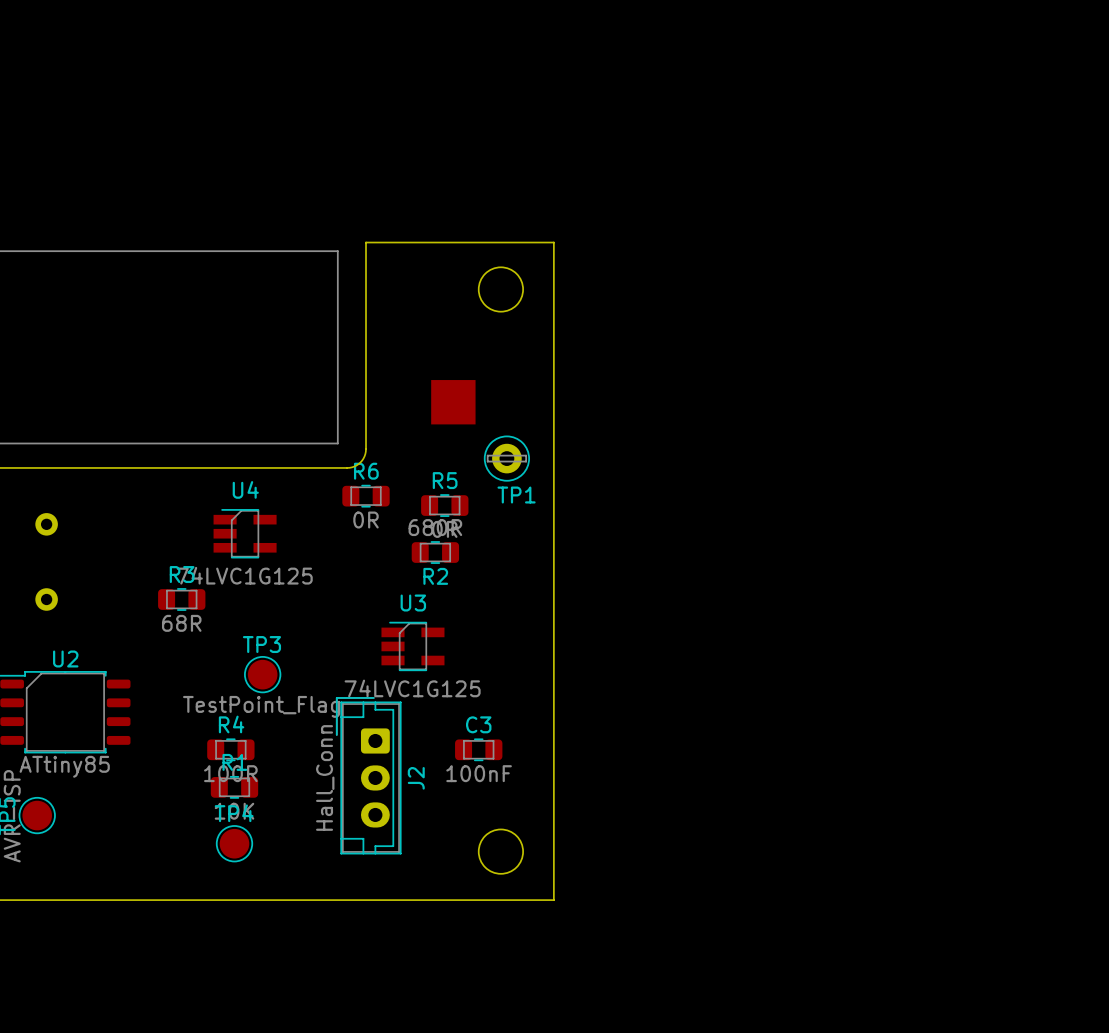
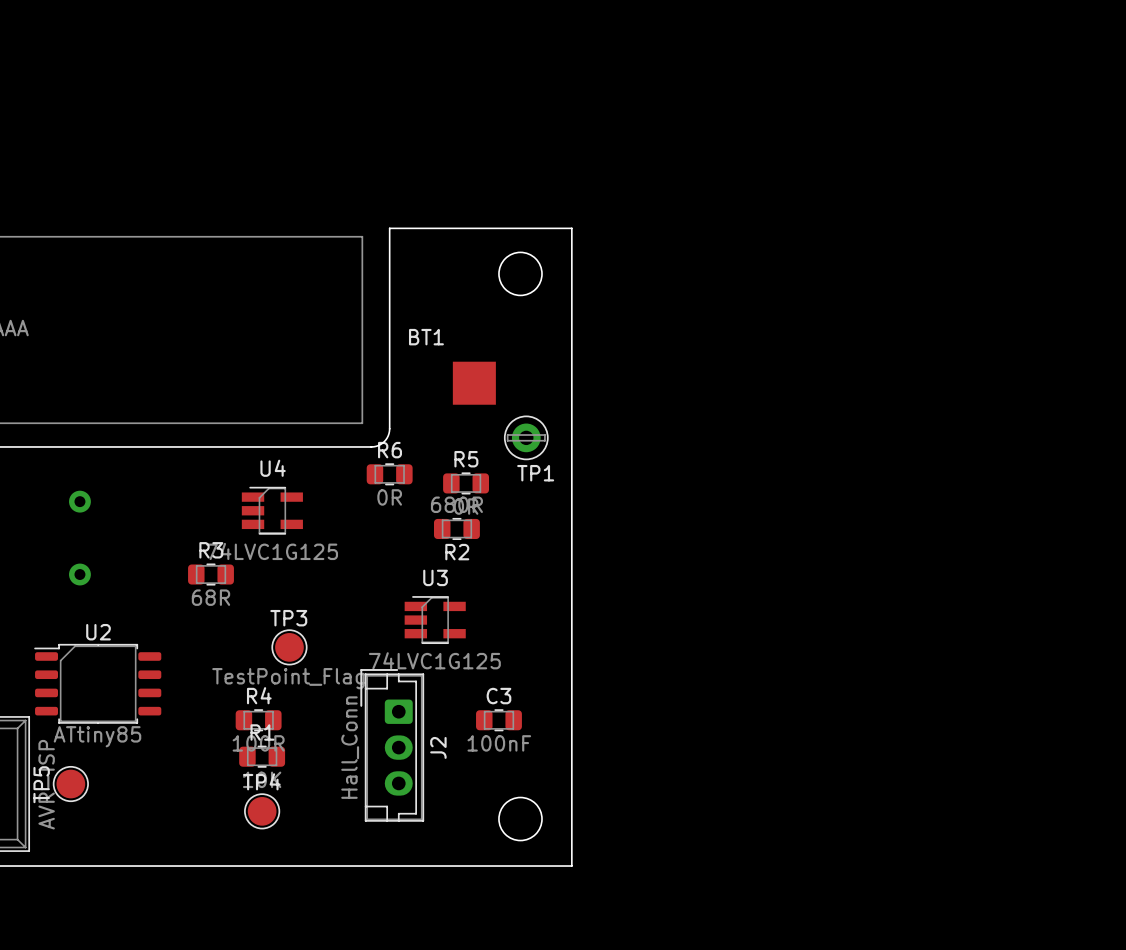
BT1 name: none -> BT1 (426, 337)

